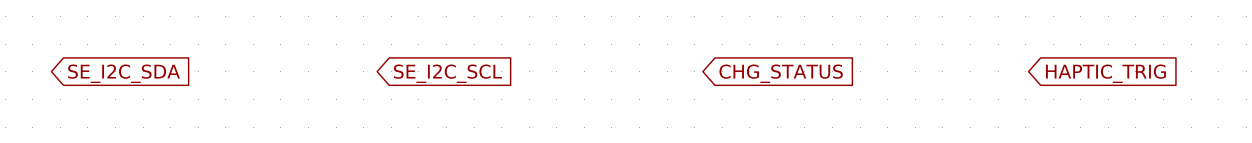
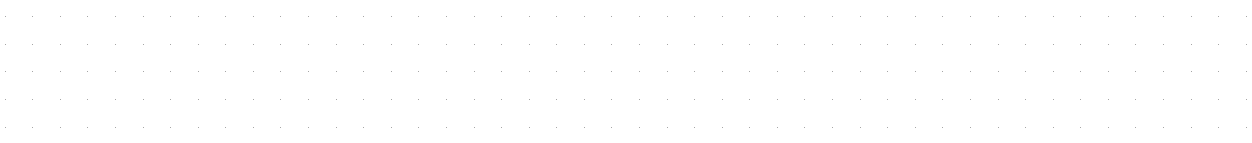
global label: SE_I2C_SDA (124, 73) -> none
global label: SE_I2C_SCL (447, 73) -> none
global label: CHG_STATUS (781, 73) -> none
global label: HAPTIC_TRIG (1105, 73) -> none

